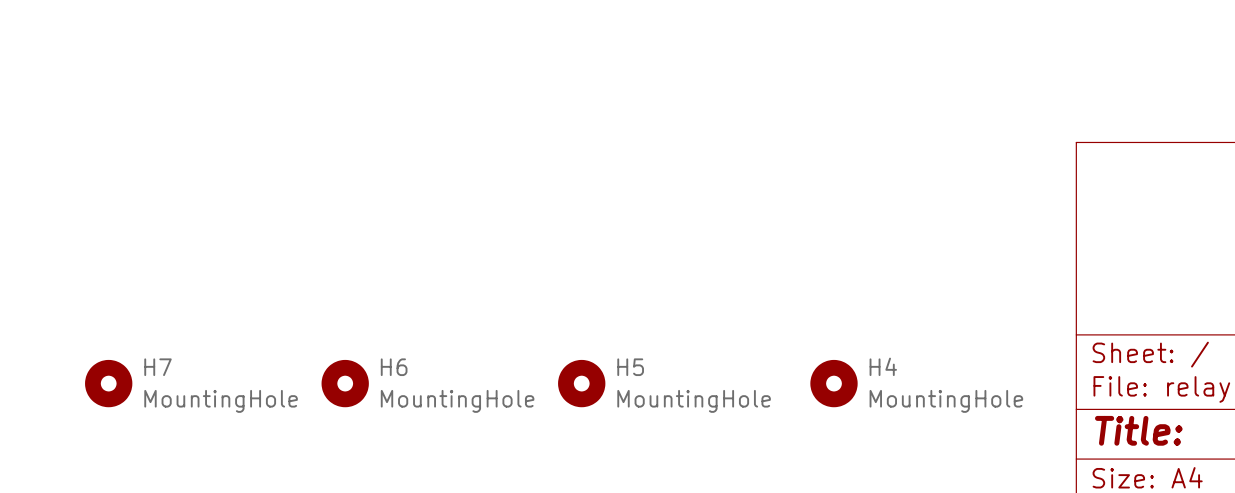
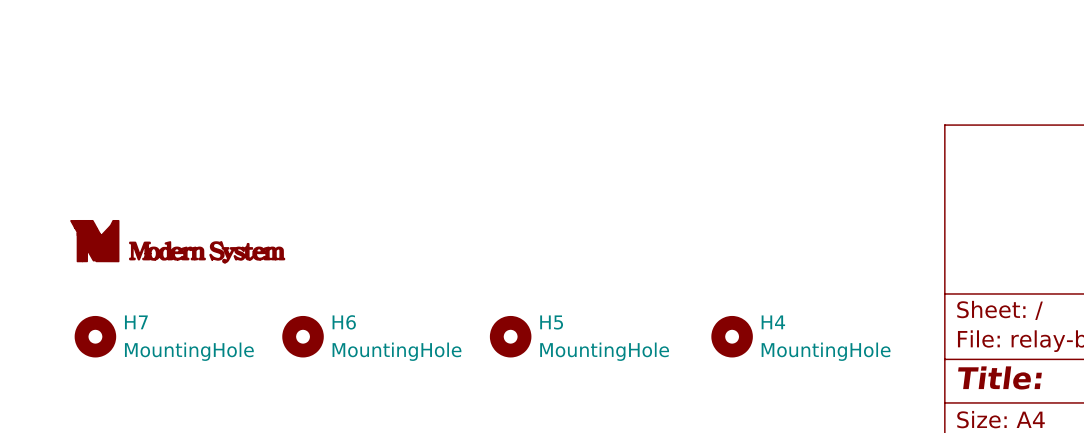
power symbol: none -> (177, 241)

